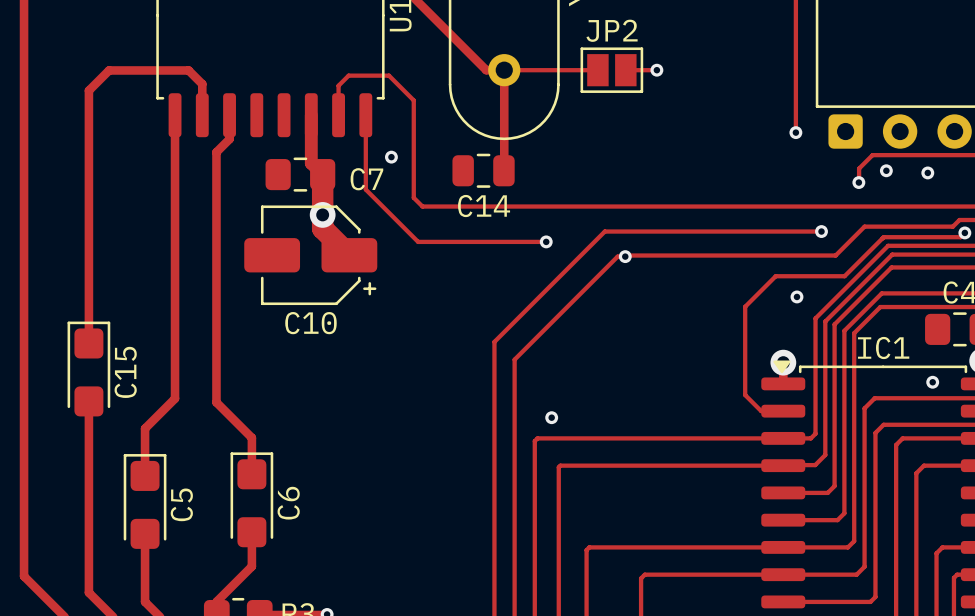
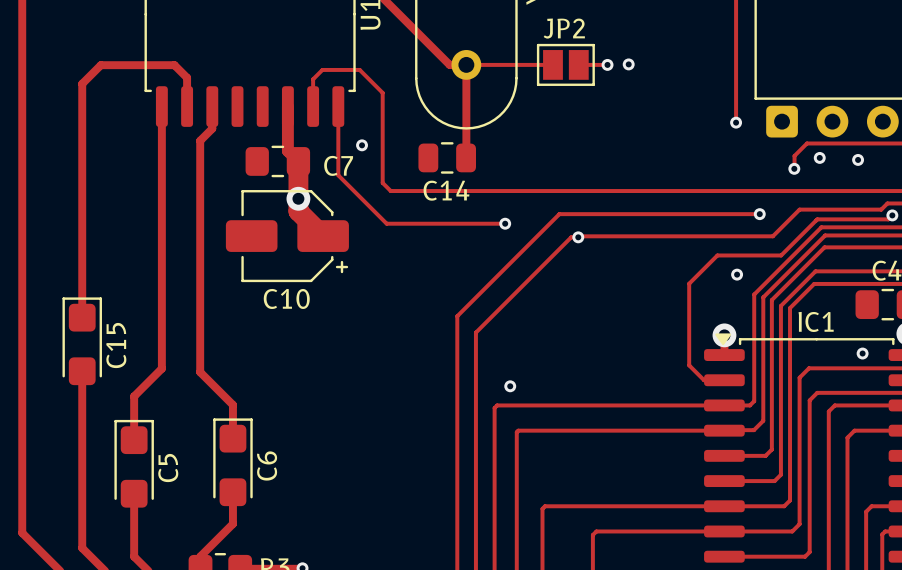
via: none -> (628, 64)

